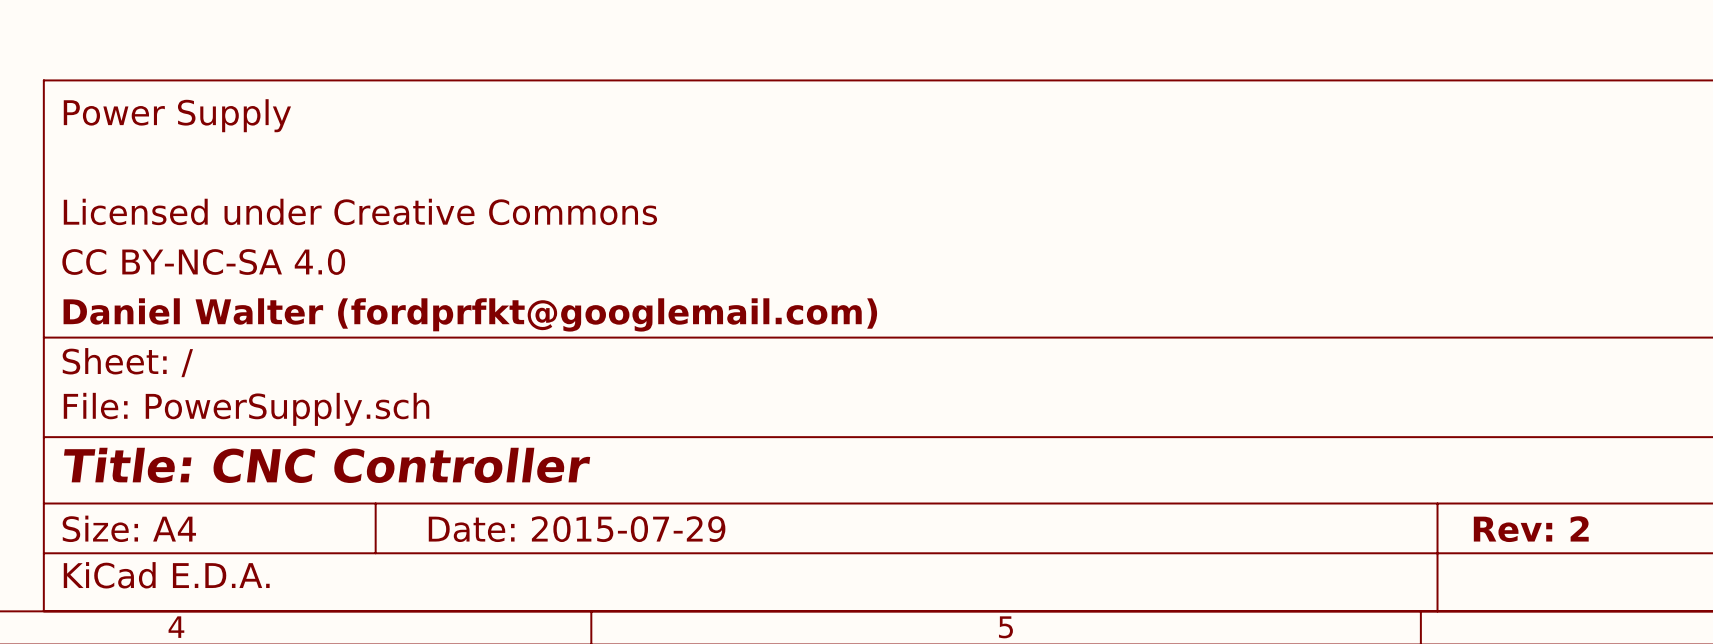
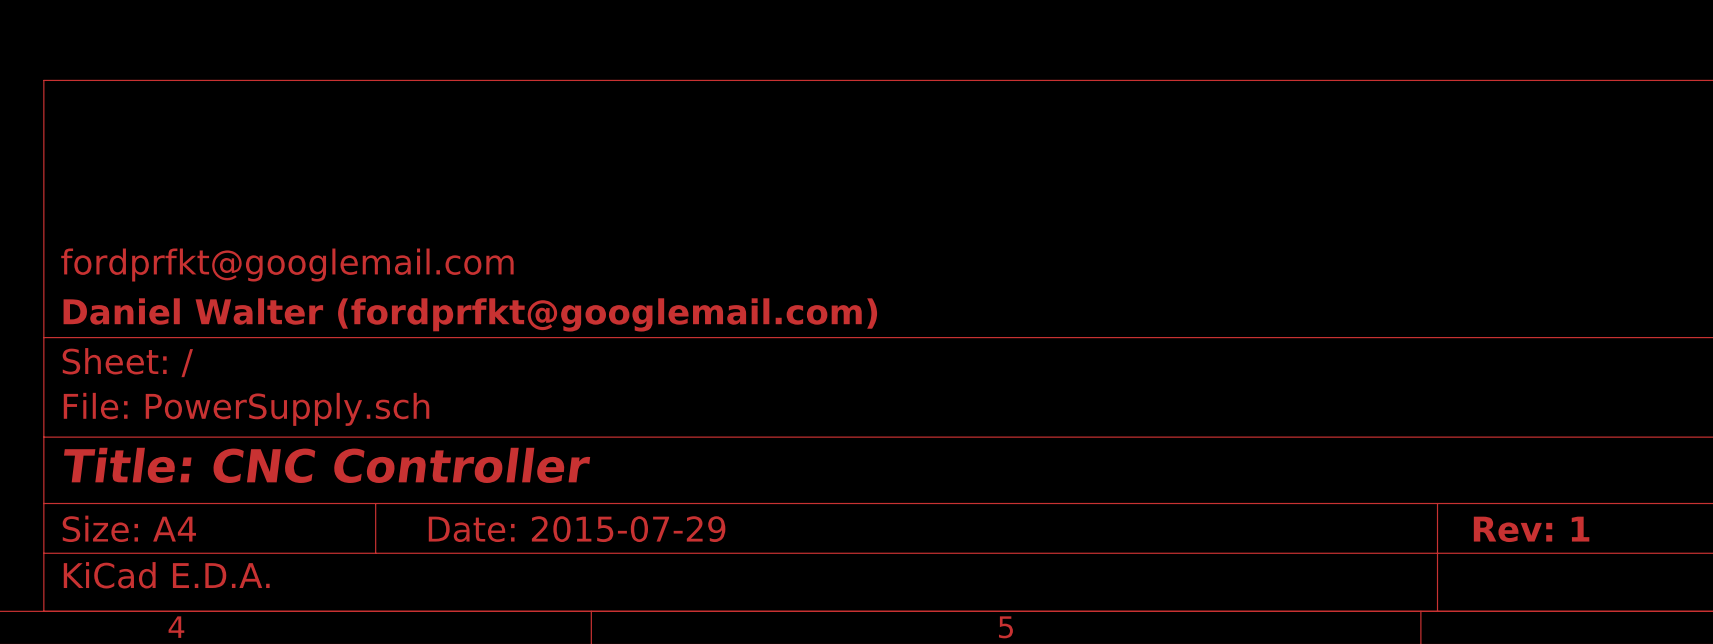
title block: Power Supply (177, 115) -> none
title block: Licensed under Creative Commons (360, 211) -> none
title block: CC BY-NC-SA 4.0 (203, 262) -> fordprfkt@googlemail.com (287, 265)
title block: Rev: 2 (1531, 529) -> Rev: 1 (1531, 529)

